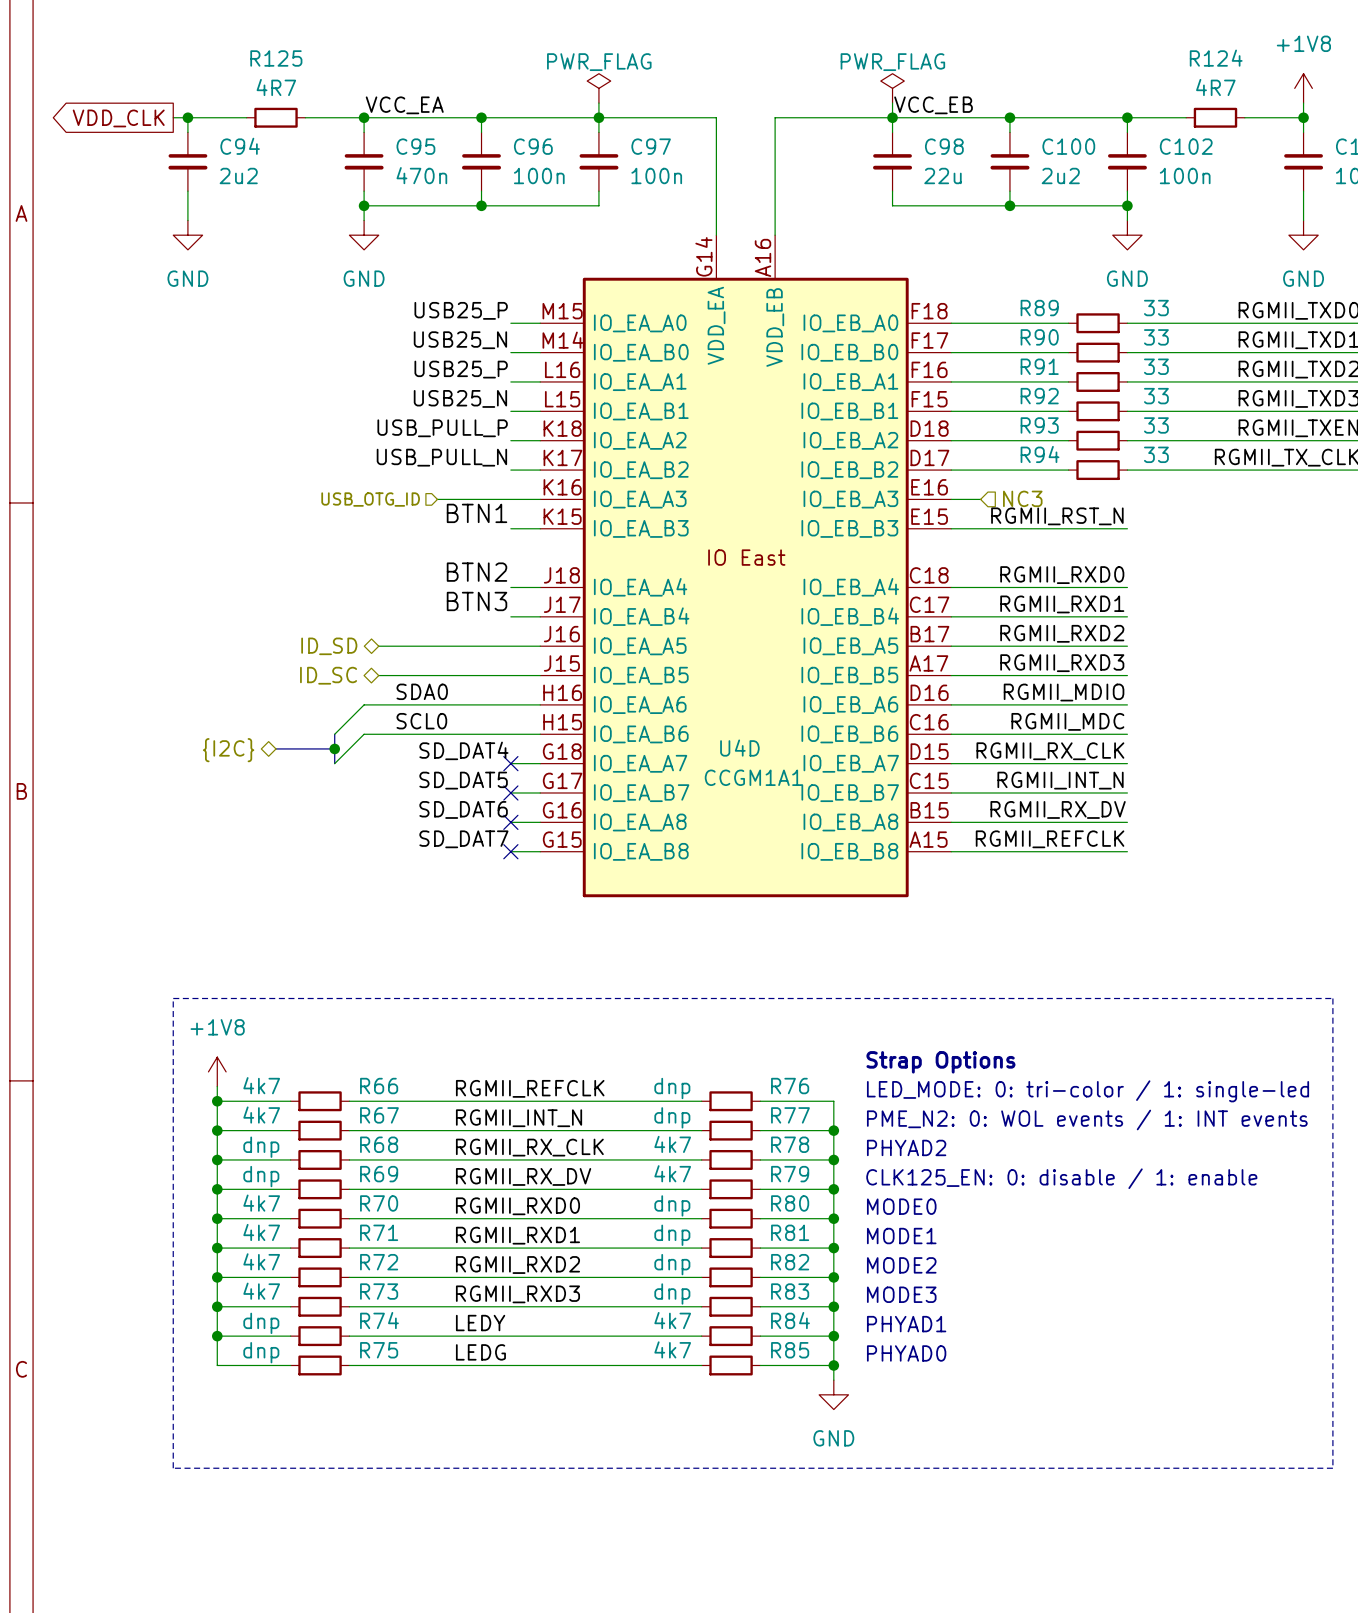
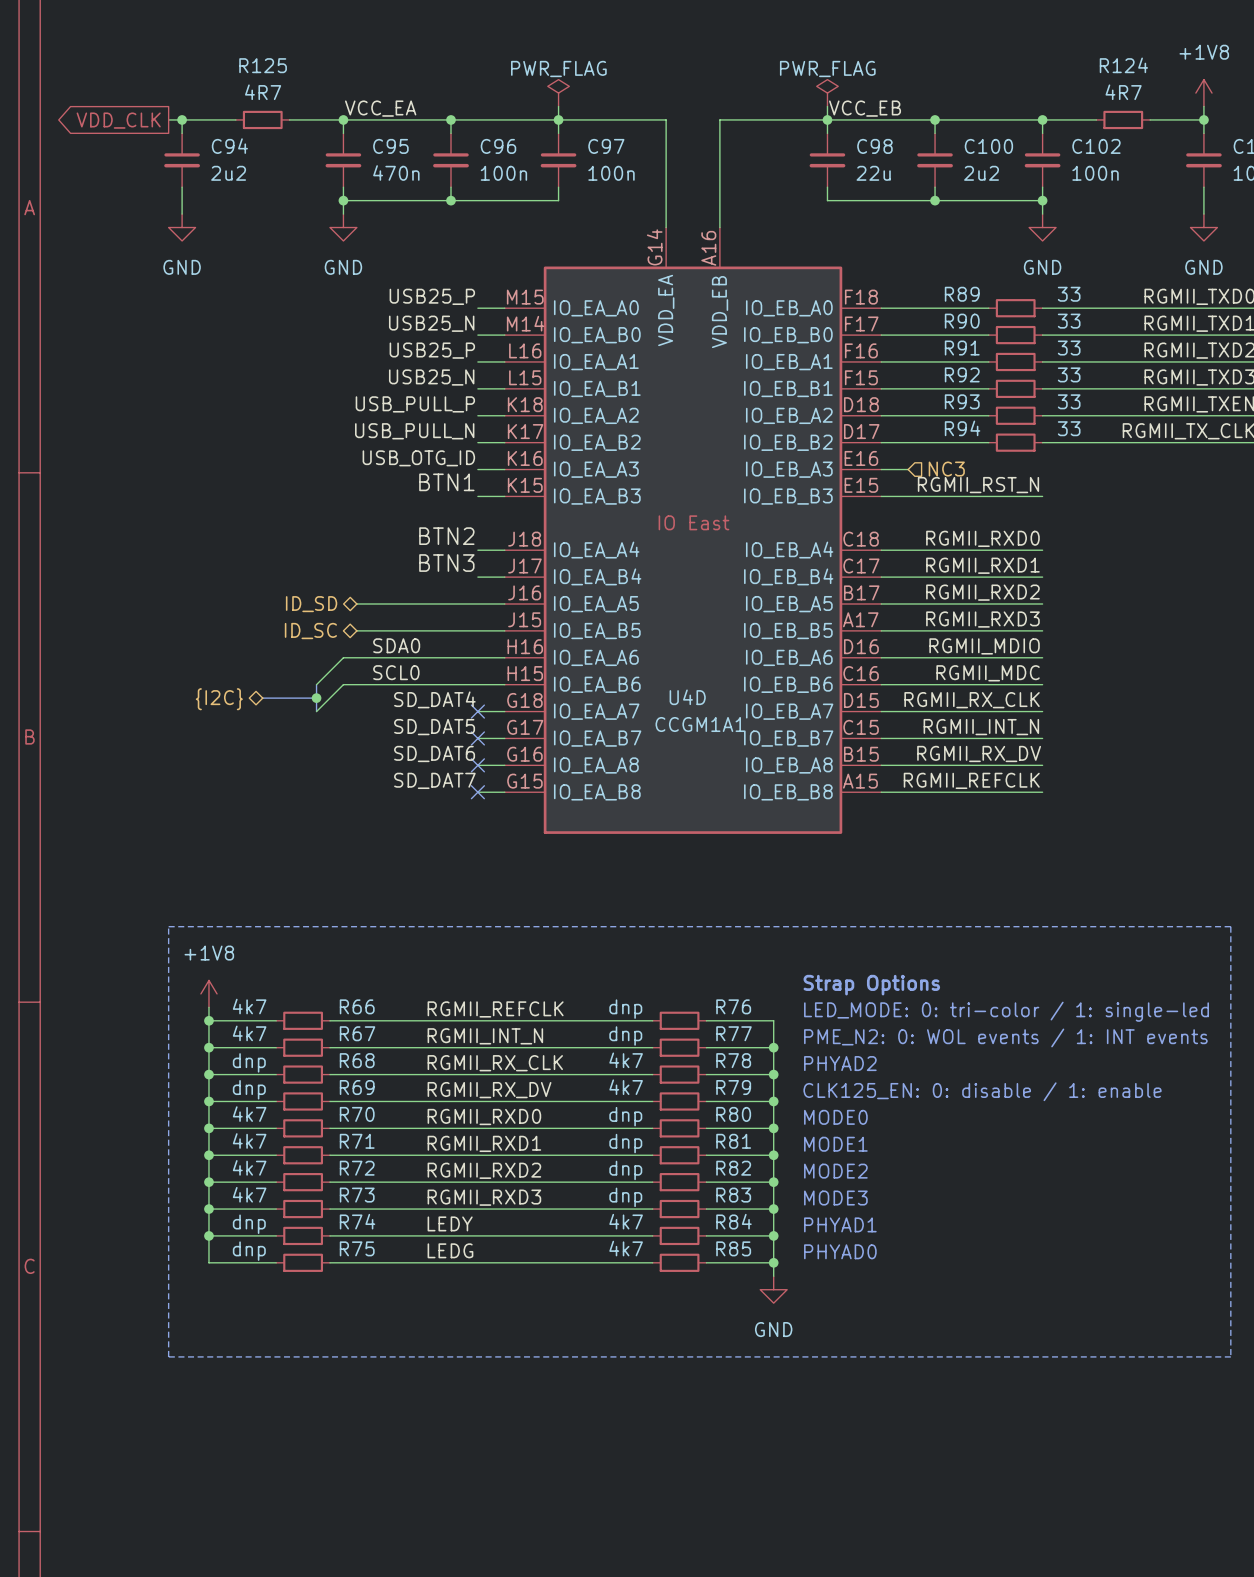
label: none -> USB_OTG_ID (418, 458)
hierarchical label: USB_OTG_ID (370, 499) -> none
wire: (437, 499) (510, 499) -> none

